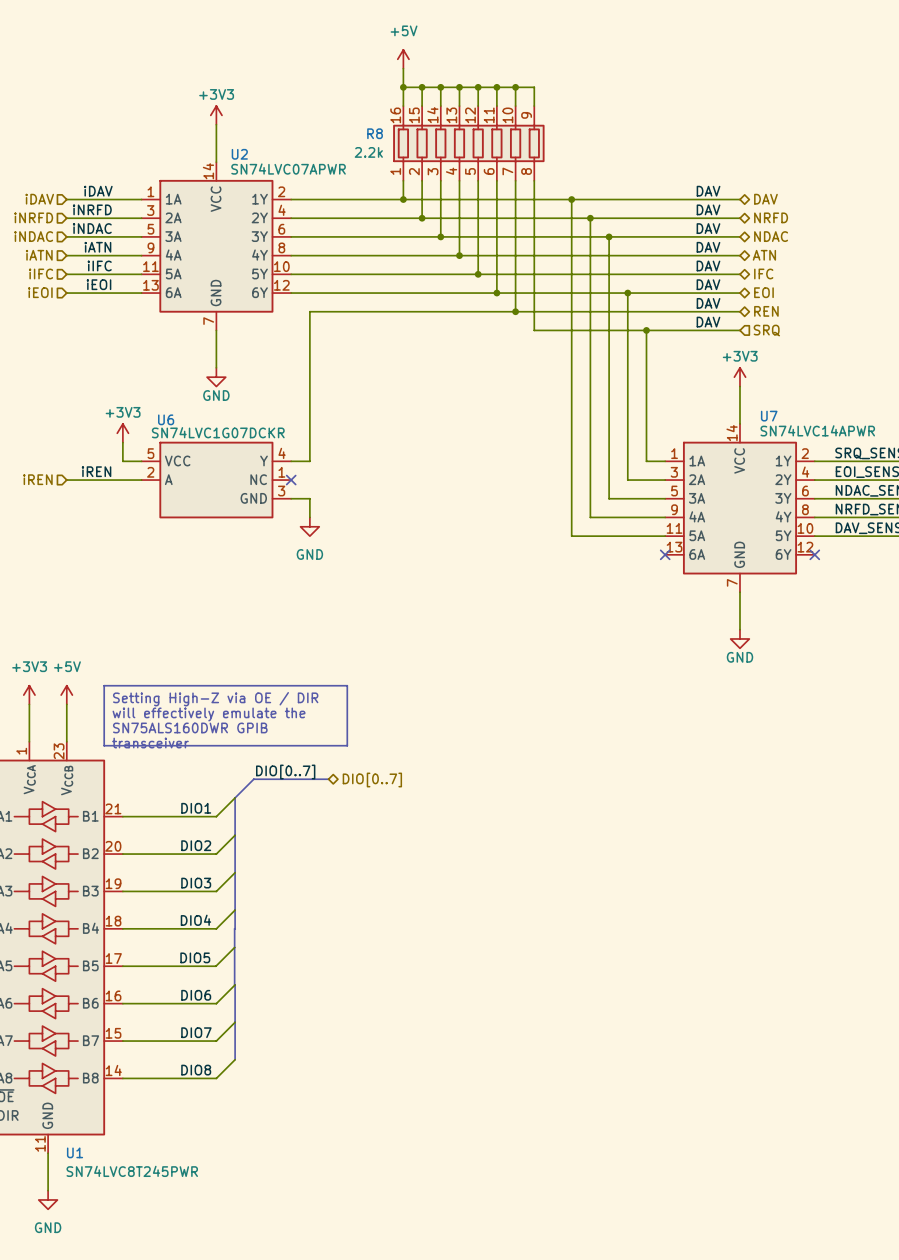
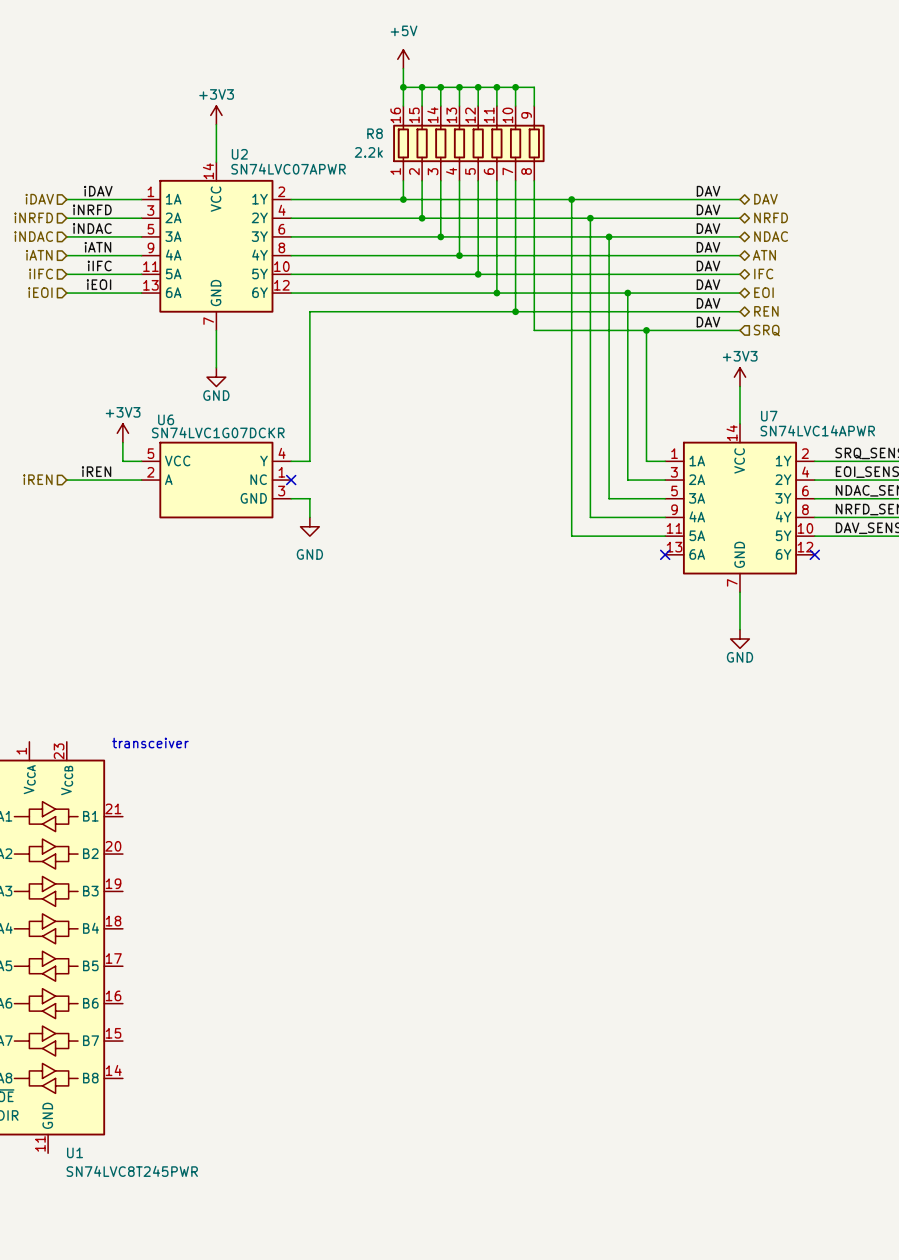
line: (104, 685) (347, 685) (347, 745) (104, 745) (104, 685) -> none
power symbol: +3V3 (29, 695) -> none
power symbol: +5V (66, 695) -> none
text: Setting High-Z via OE / DIR (215, 699) -> none
wire: (29, 704) (29, 741) -> none
wire: (66, 704) (66, 741) -> none
text: will effectively emulate the (209, 714) -> none
text: SN75ALS160DWR GPIB (190, 727) -> none
label: DIO[0..7] (285, 772) -> none
bus: (328, 779) (253, 779) (235, 797) (235, 1059) -> none
hierarchical label: DIO[0..7] (372, 780) -> none
wire: (235, 797) (216, 816) (122, 816) -> none
label: DIO1 (196, 808) -> none
wire: (235, 835) (216, 854) (122, 854) -> none
label: DIO2 (196, 845) -> none
wire: (235, 872) (216, 891) (122, 891) -> none
label: DIO3 (196, 883) -> none
wire: (235, 910) (216, 928) (122, 928) -> none
label: DIO4 (195, 920) -> none
wire: (234, 947) (215, 966) (122, 966) -> none
label: DIO5 (195, 957) -> none
wire: (235, 984) (216, 1003) (122, 1003) -> none
label: DIO6 (196, 995) -> none
wire: (235, 1022) (216, 1041) (122, 1041) -> none
label: DIO7 (196, 1032) -> none
wire: (235, 1059) (216, 1078) (122, 1078) -> none
label: DIO8 (196, 1070) -> none
wire: (48, 1153) (48, 1190) -> none
power symbol: GND (48, 1199) -> none

